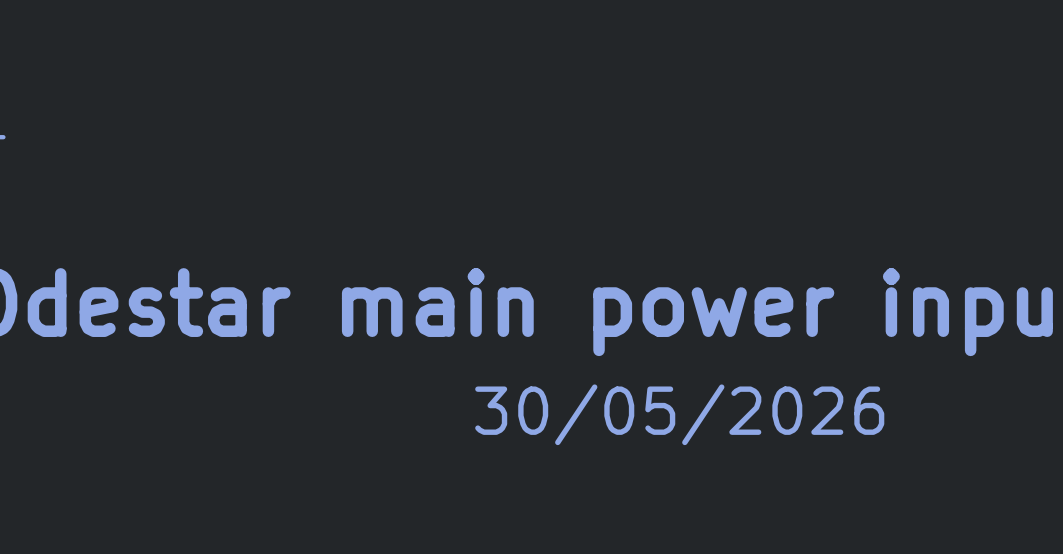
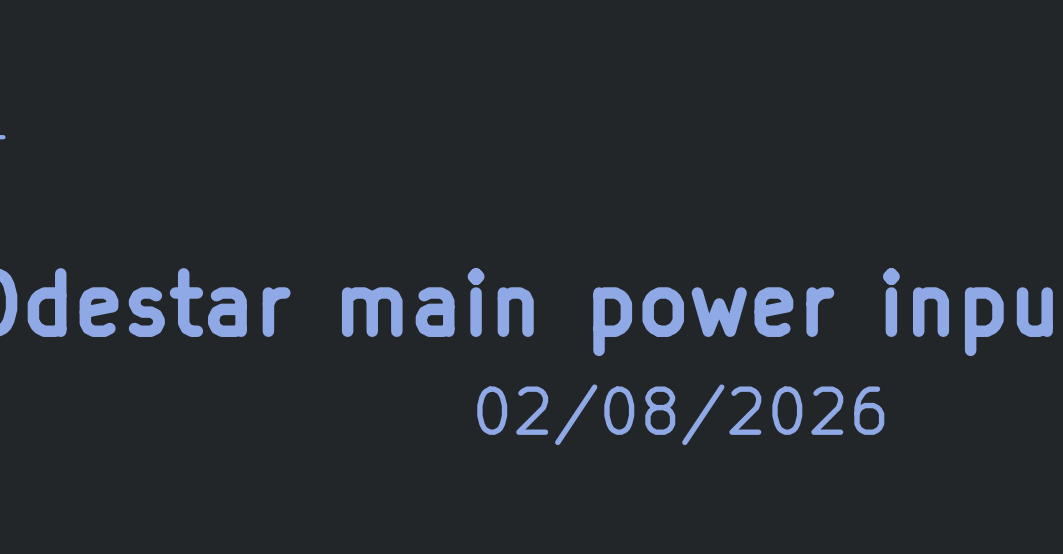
text: 30/05/2026 (679, 414) -> 02/08/2026 (680, 414)

